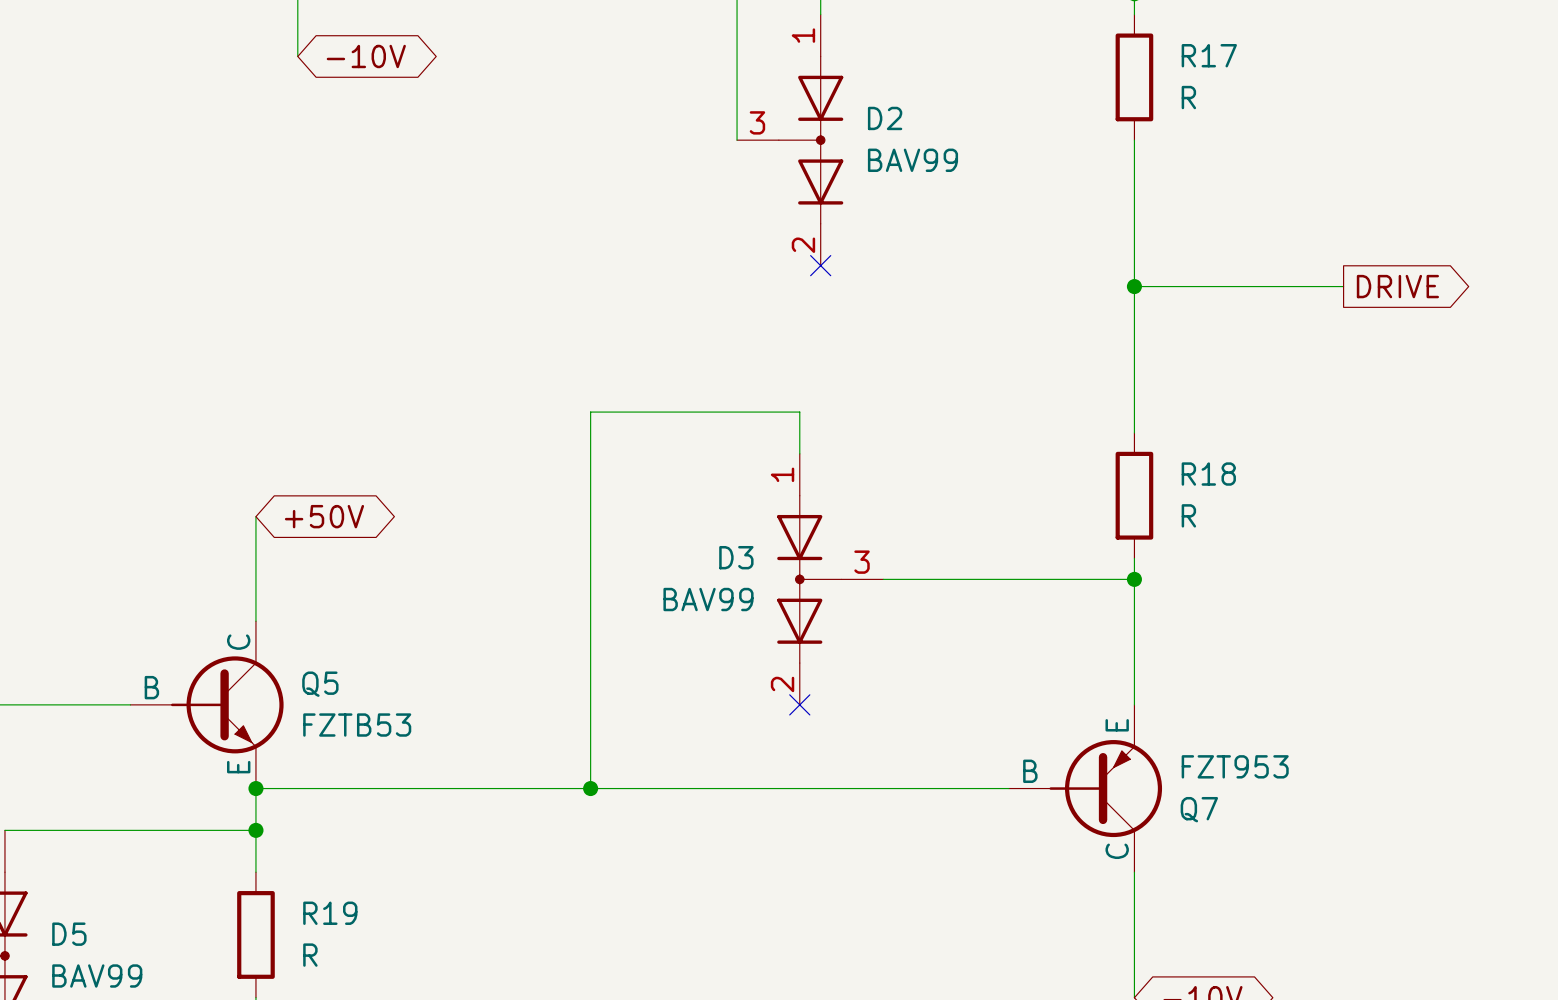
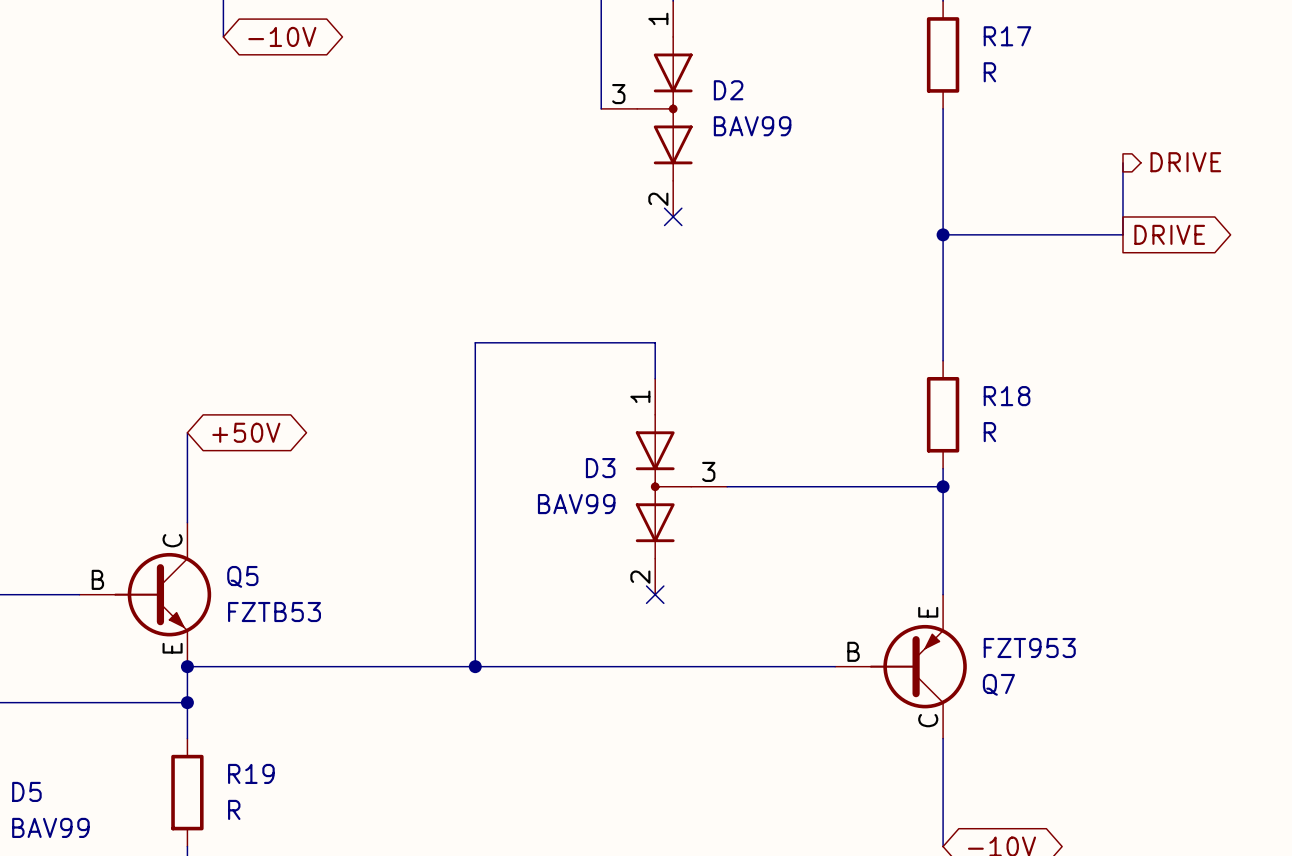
wire: none -> (1122, 162) (1122, 234)
hierarchical label: none -> DRIVE (1185, 162)

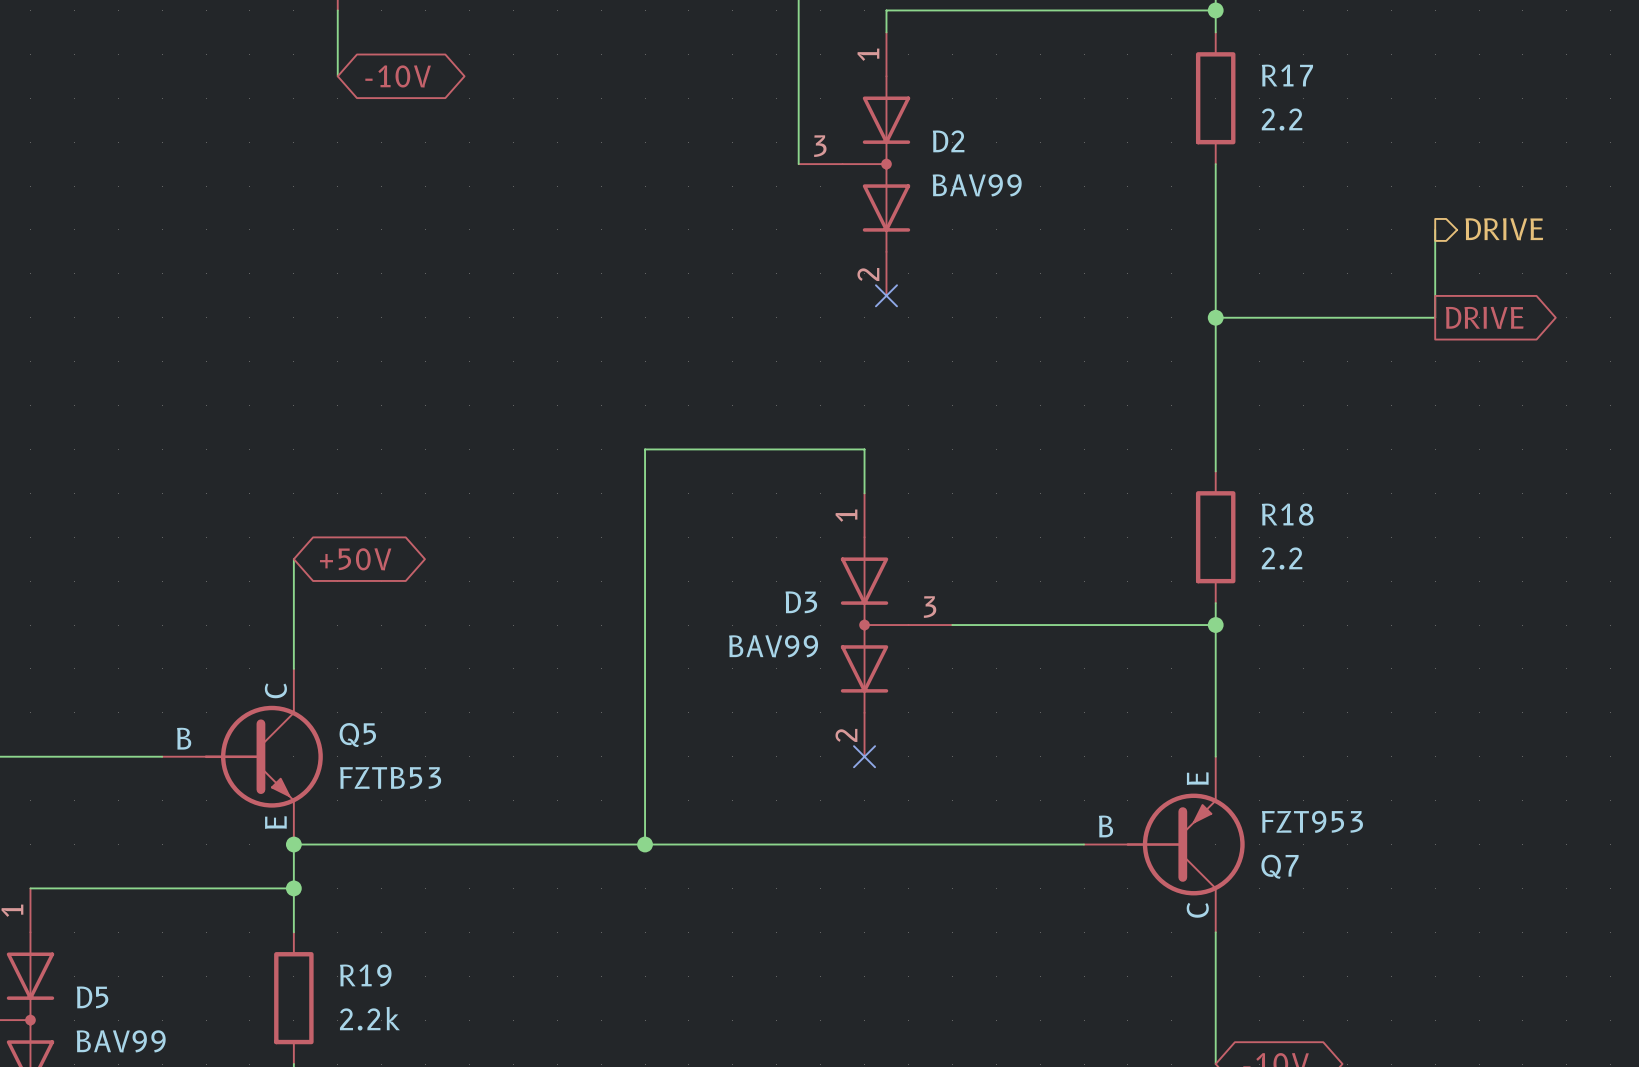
R17 value: R (989, 72) -> 2.2 (1282, 119)
R18 value: R (989, 432) -> 2.2 (1282, 558)
R19 value: R (234, 809) -> 2.2k (369, 1018)

